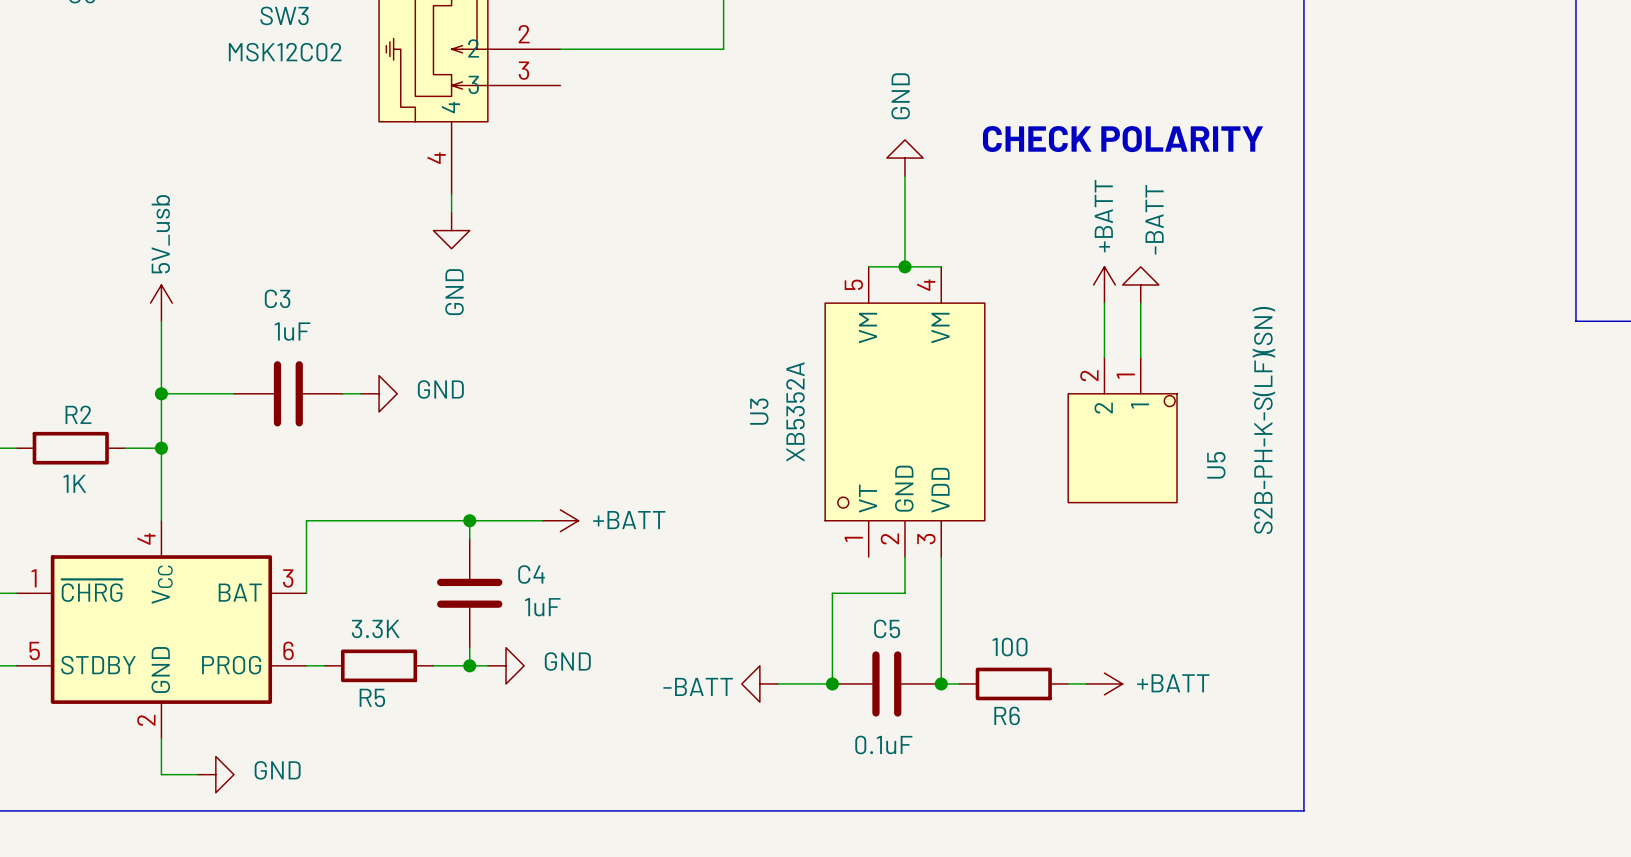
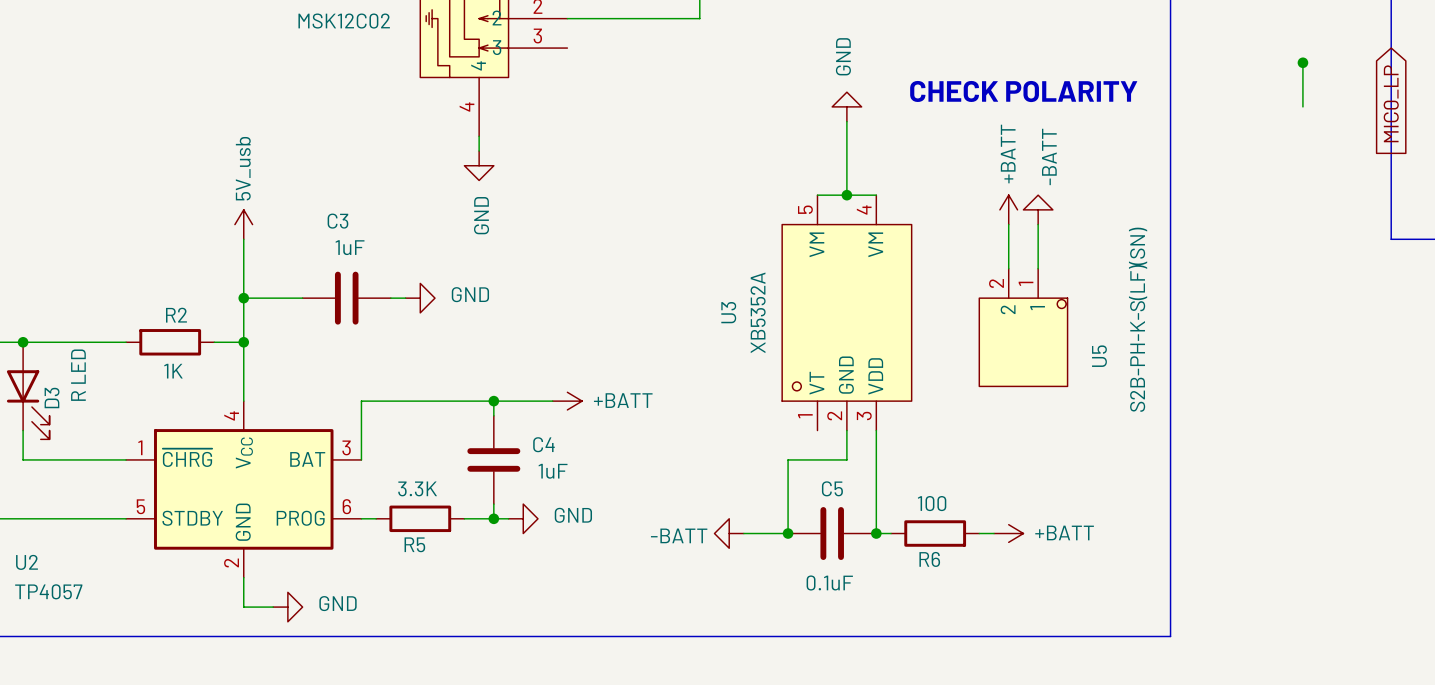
wire: none -> (1302, 62) (1302, 106)
junction: none -> (1302, 62)
global label: none -> MIC0_LP (1391, 103)

